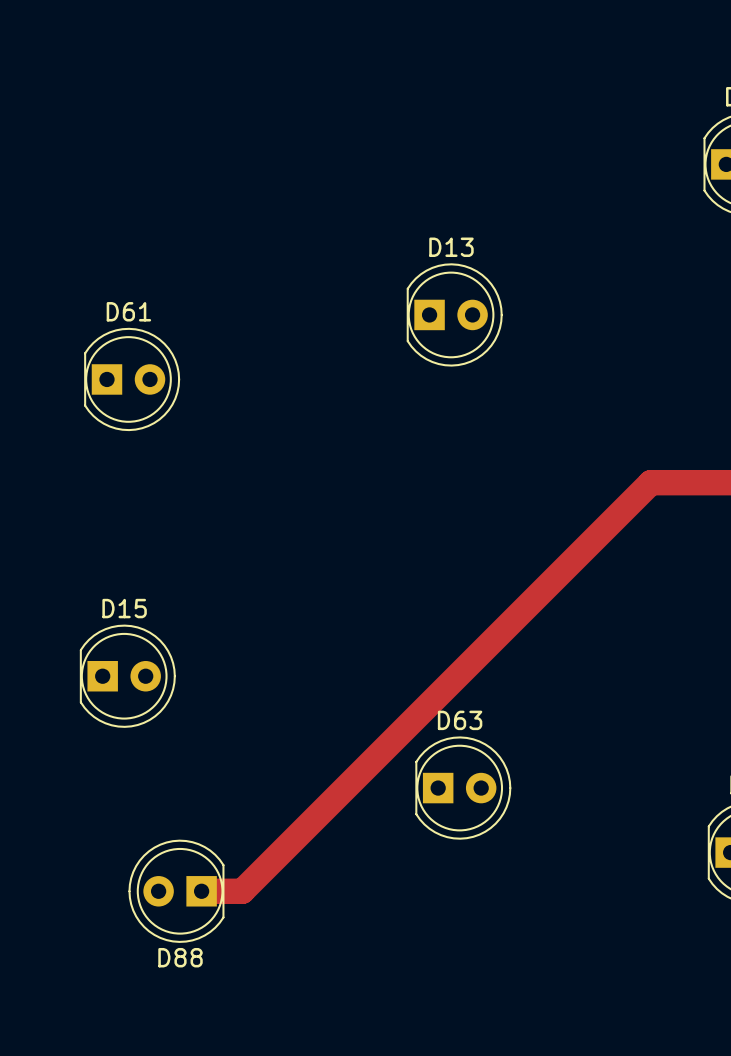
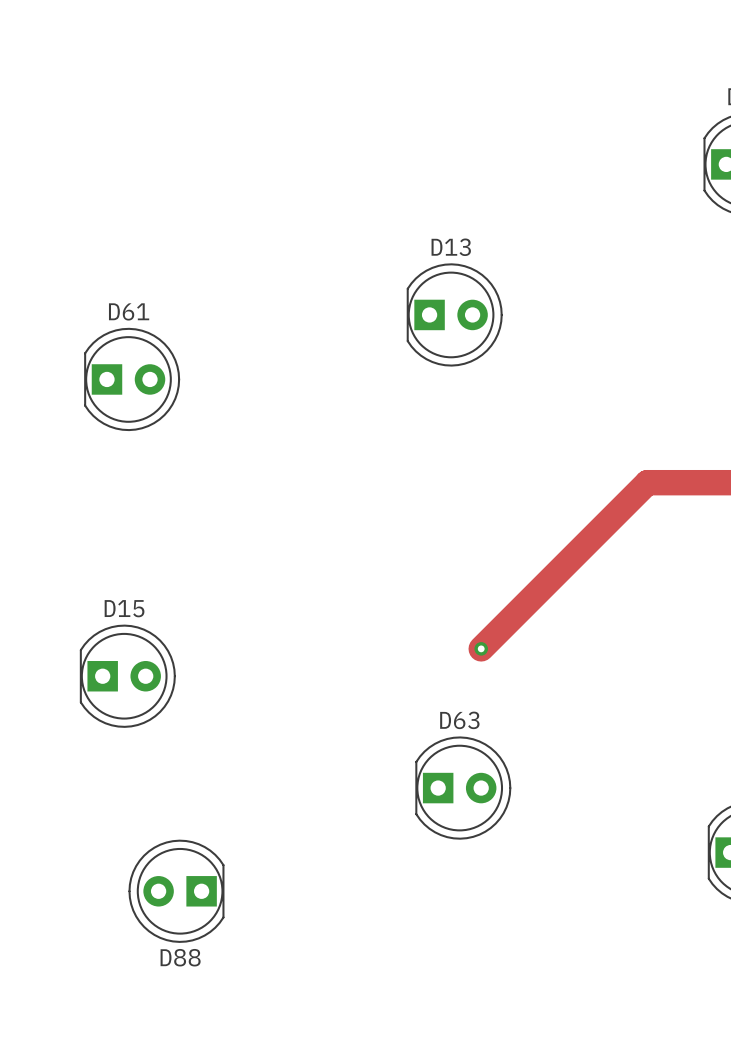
track: (650, 482) (242, 891) (201, 891) -> (650, 482) (647, 482) (481, 648)
via: none -> (481, 648)

